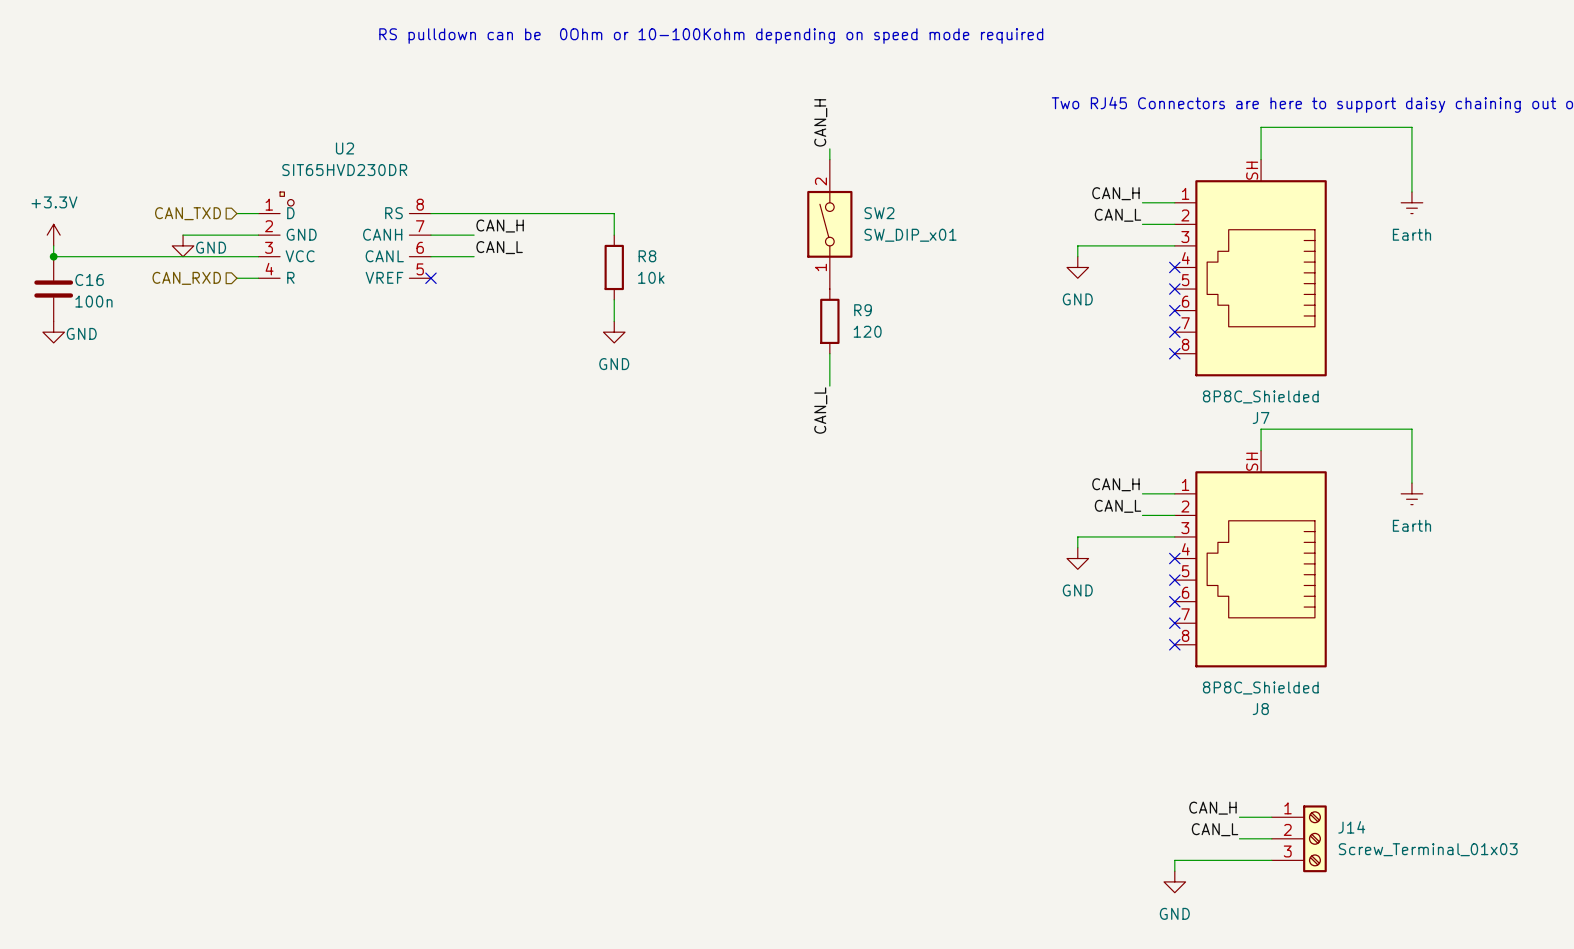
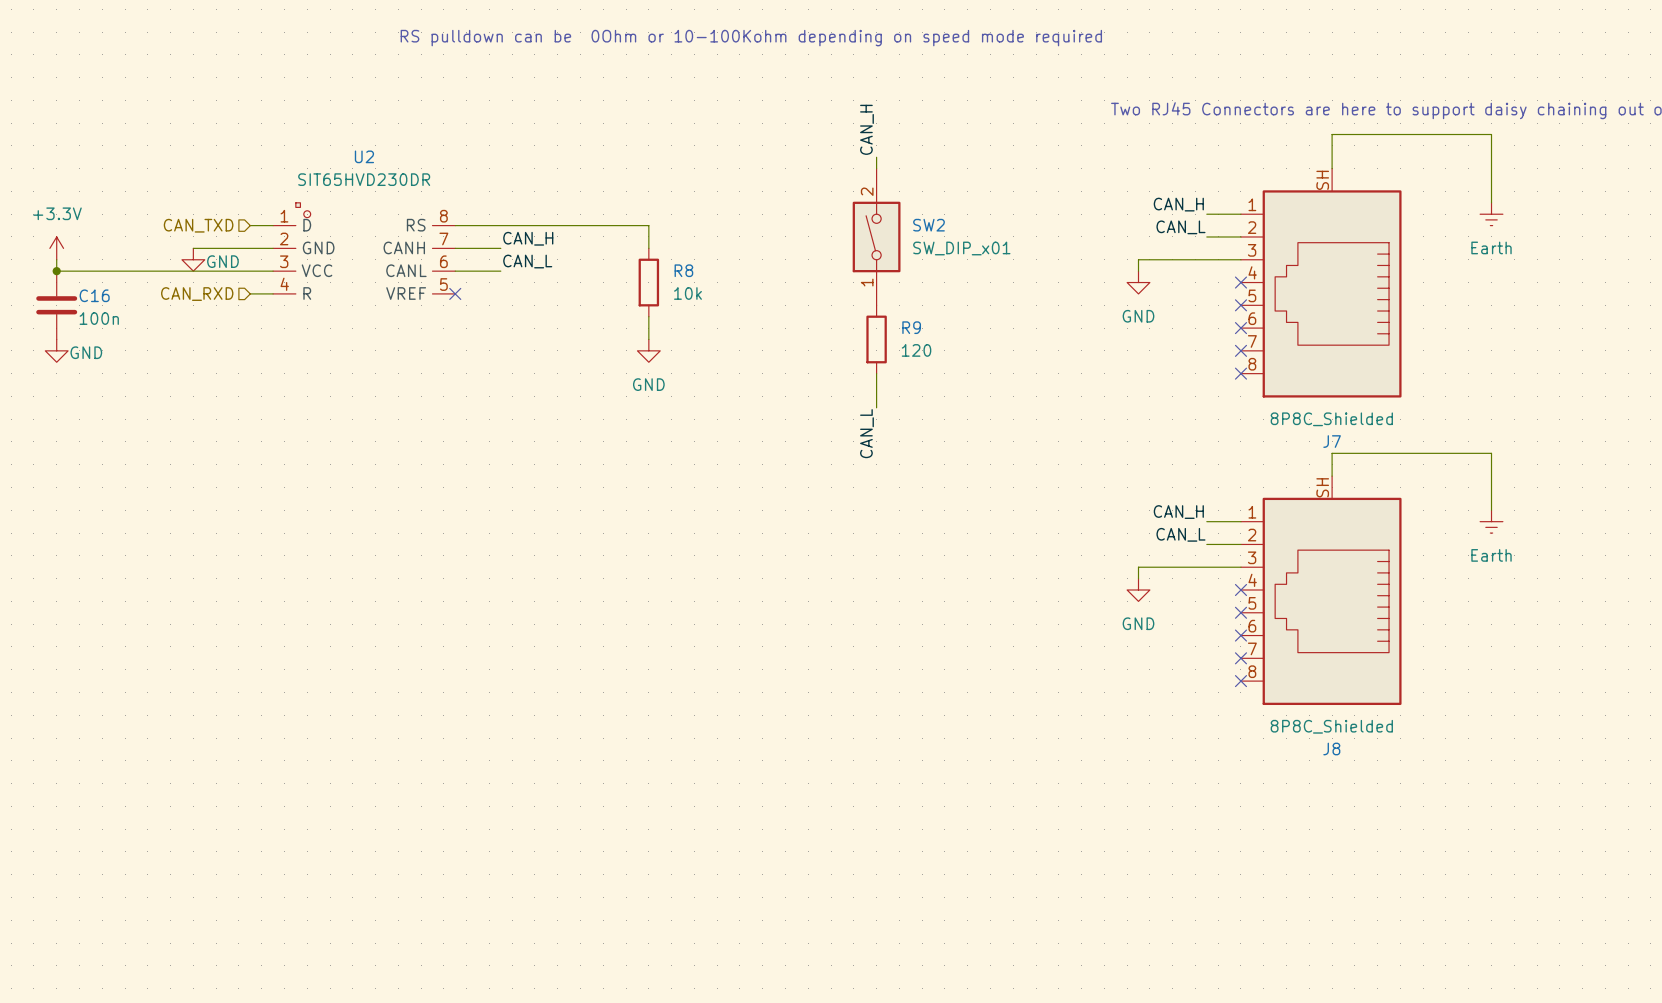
label: CAN_H (1212, 808) -> none
wire: (1239, 817) (1271, 817) -> none
label: CAN_L (1215, 829) -> none
wire: (1239, 838) (1271, 838) -> none
J14: Screw_Terminal_01x03 (1299, 838) -> none
wire: (1271, 860) (1174, 860) (1174, 871) -> none
power symbol: GND (1174, 881) -> none

